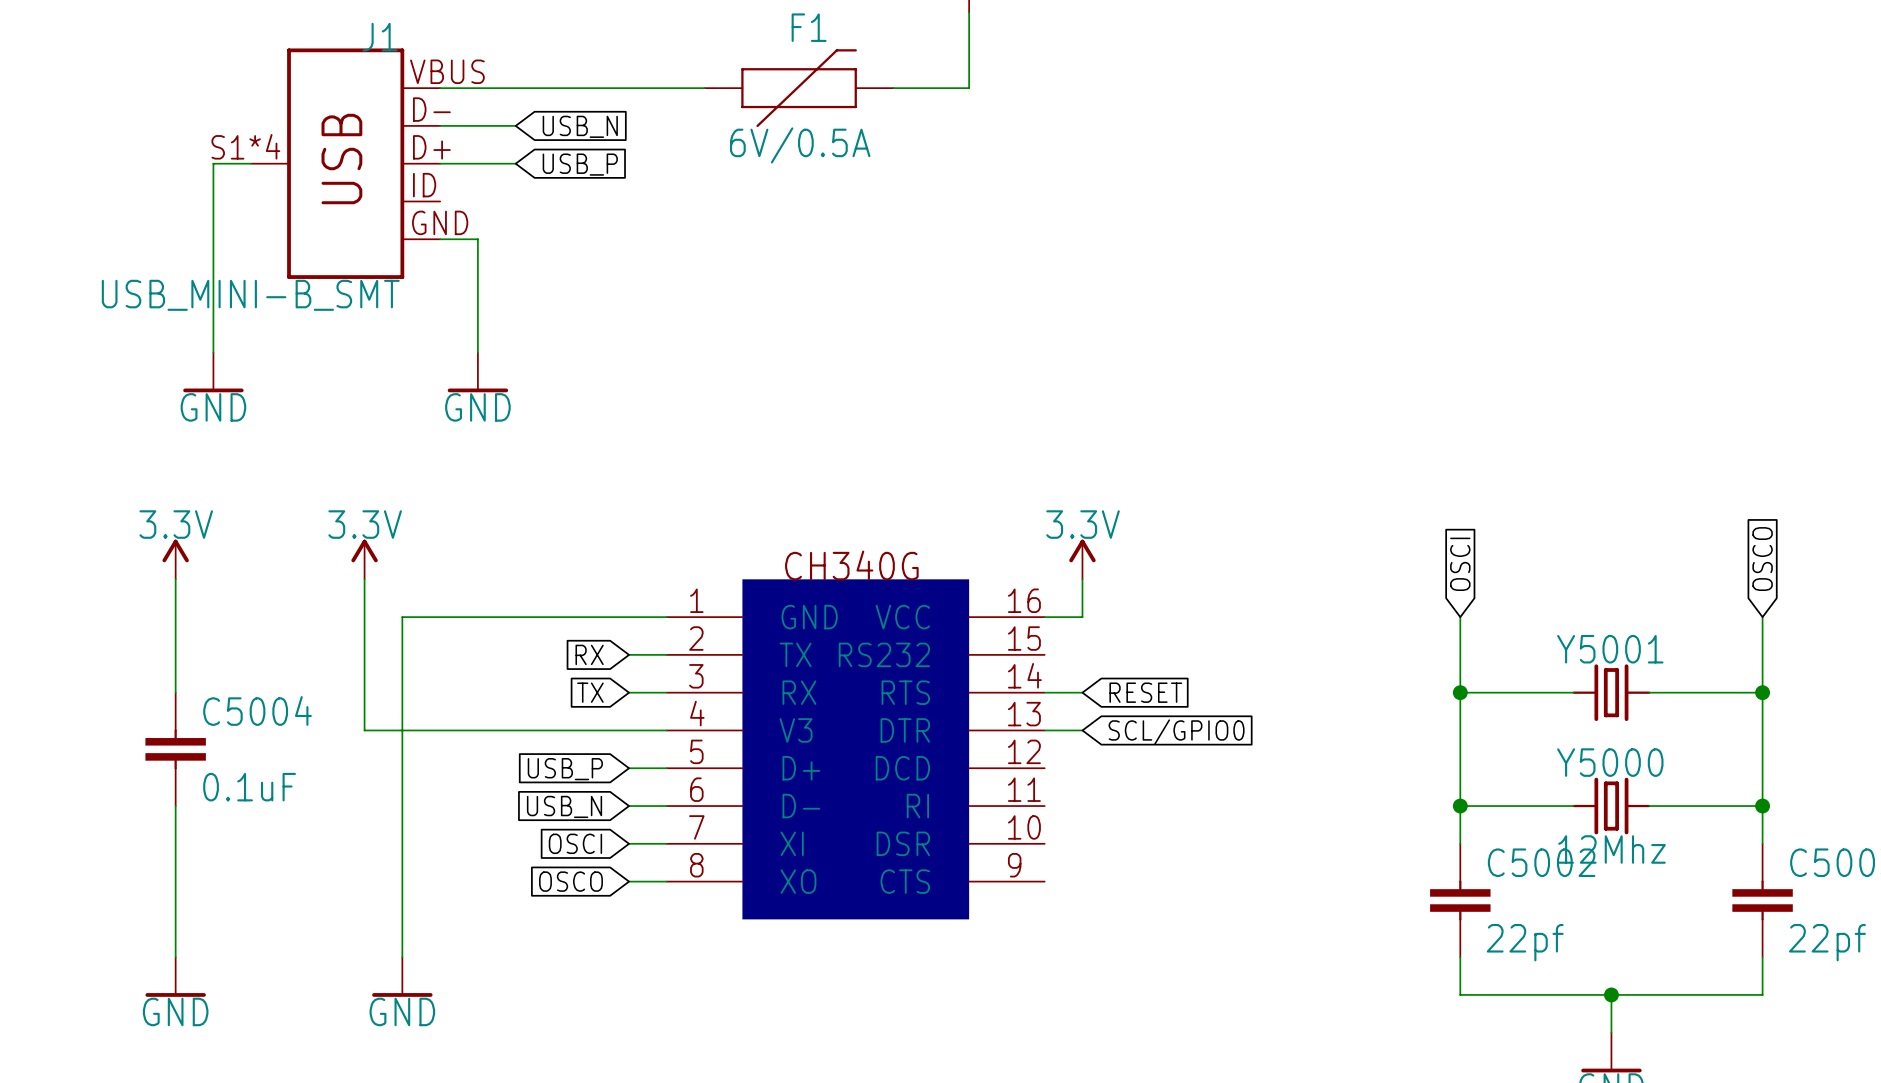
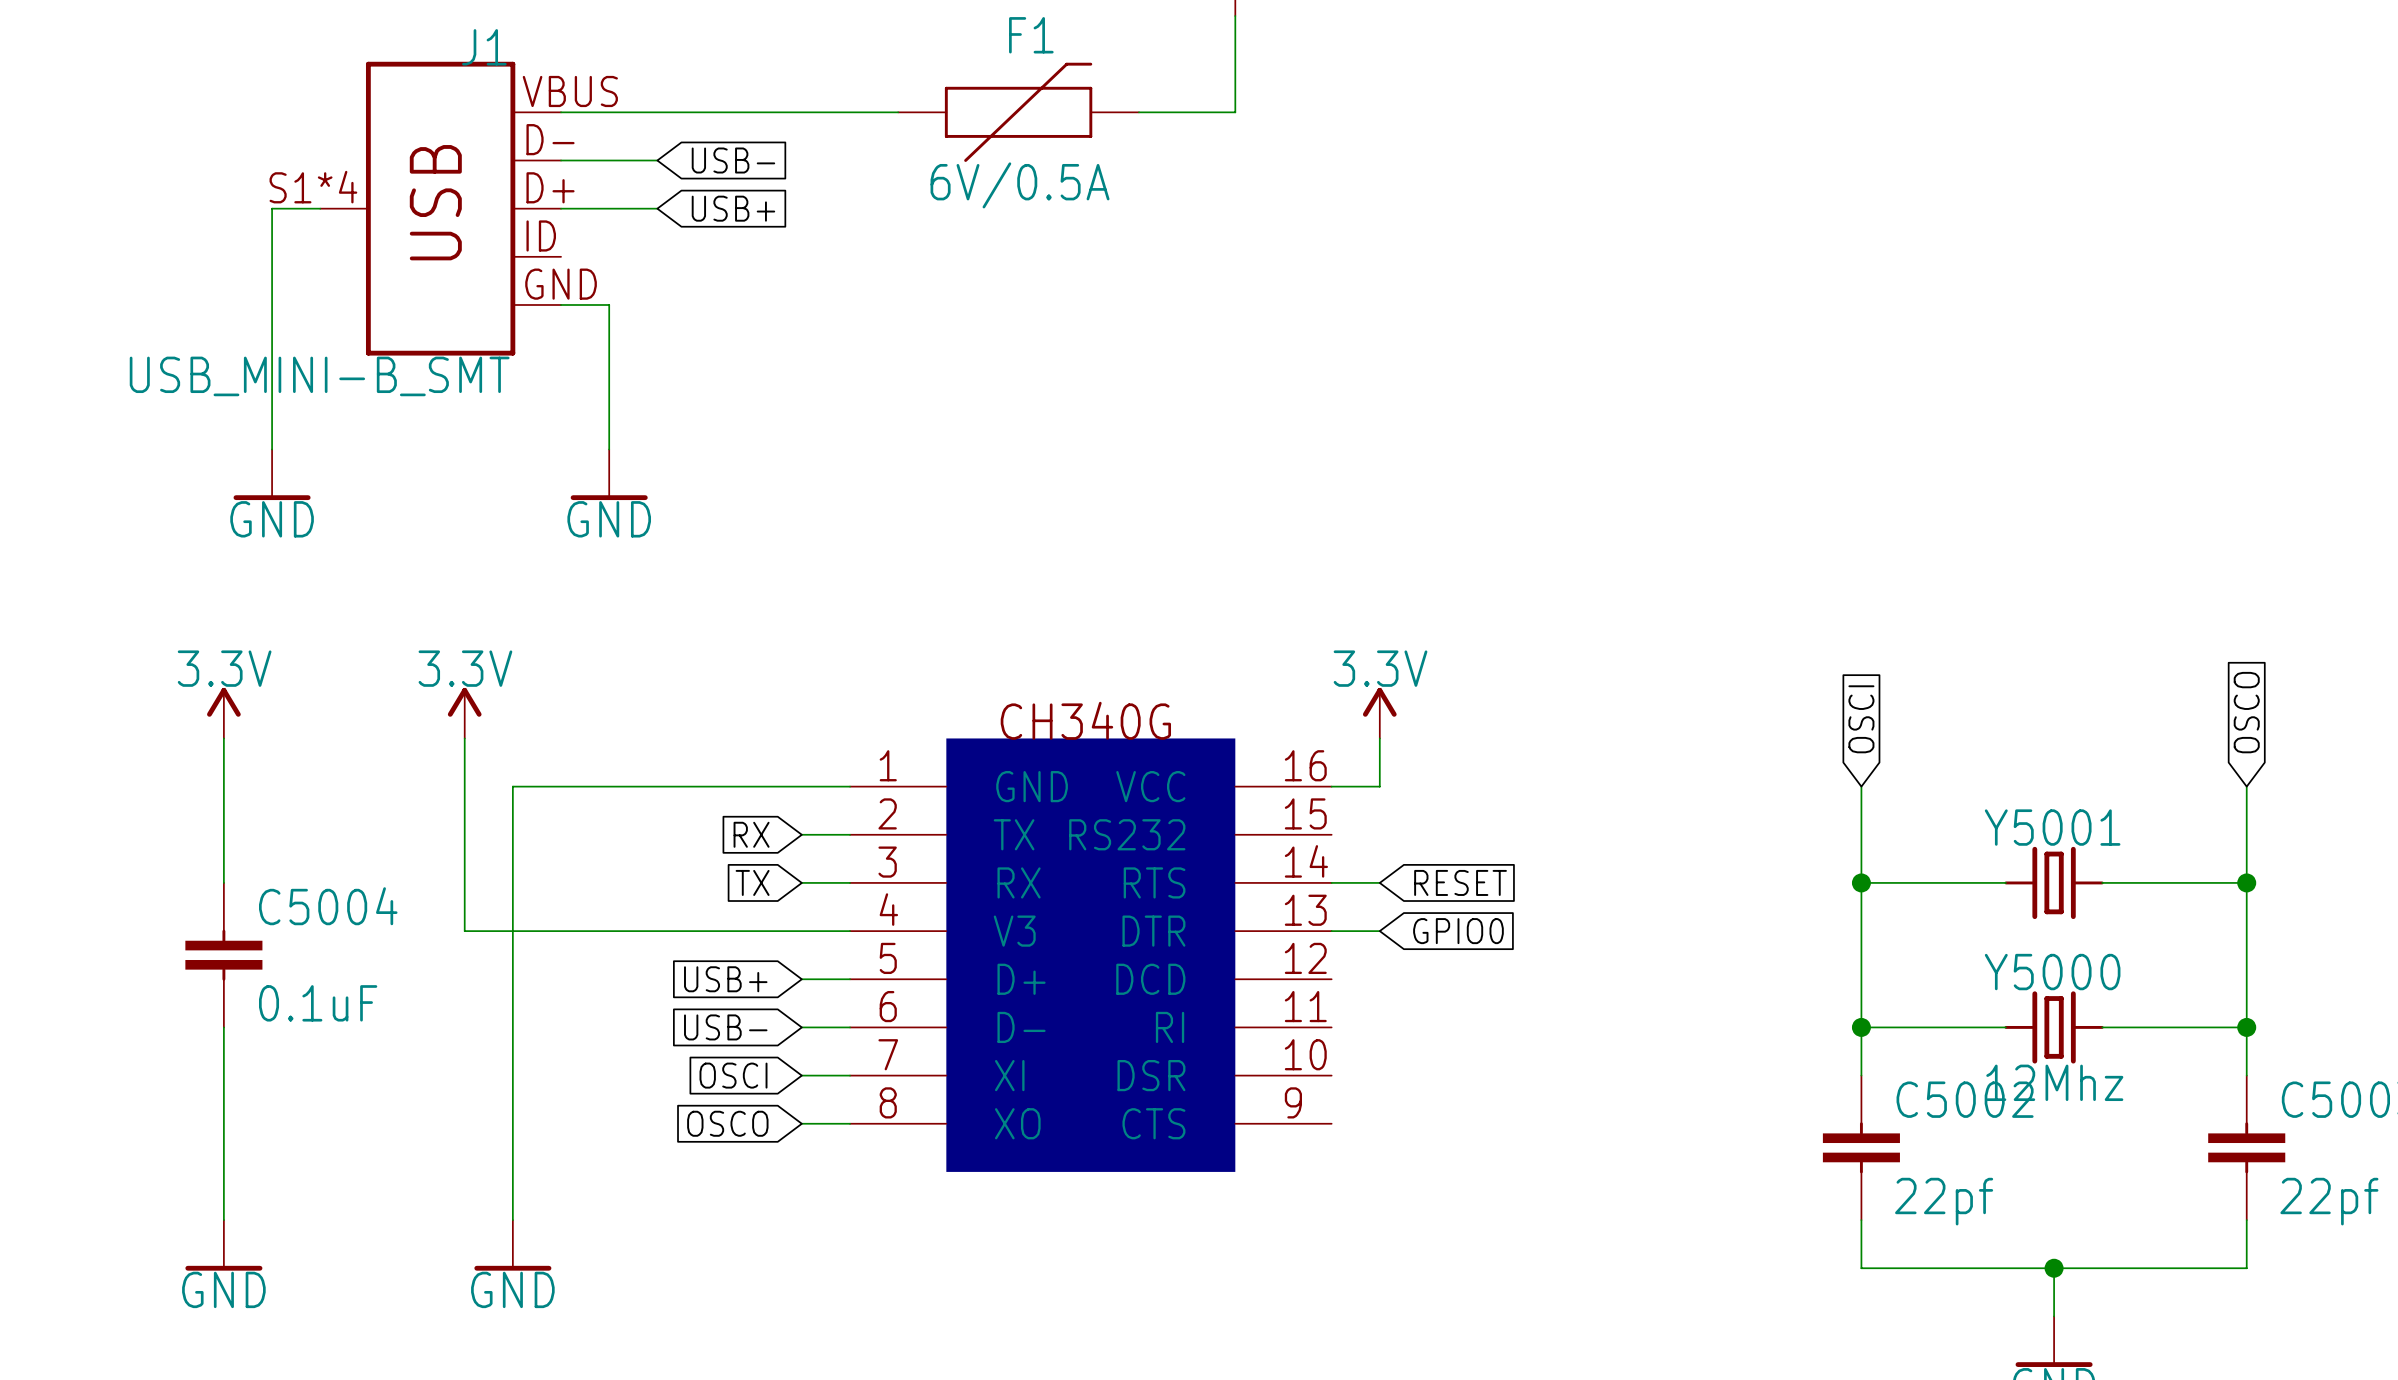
global label: USB_N (580, 126) -> USB- (733, 160)
global label: USB_P (580, 164) -> USB+ (733, 208)
global label: SCL/GPIO0 (1176, 732) -> GPIO0 (1458, 931)
global label: USB_P (565, 769) -> USB+ (725, 979)
global label: USB_N (564, 806) -> USB- (725, 1027)

